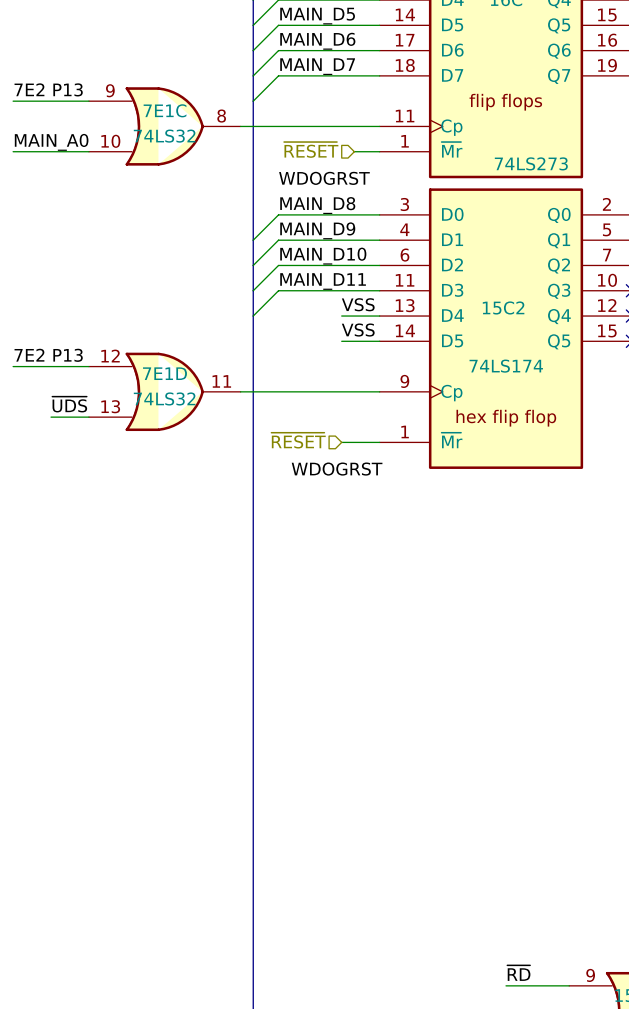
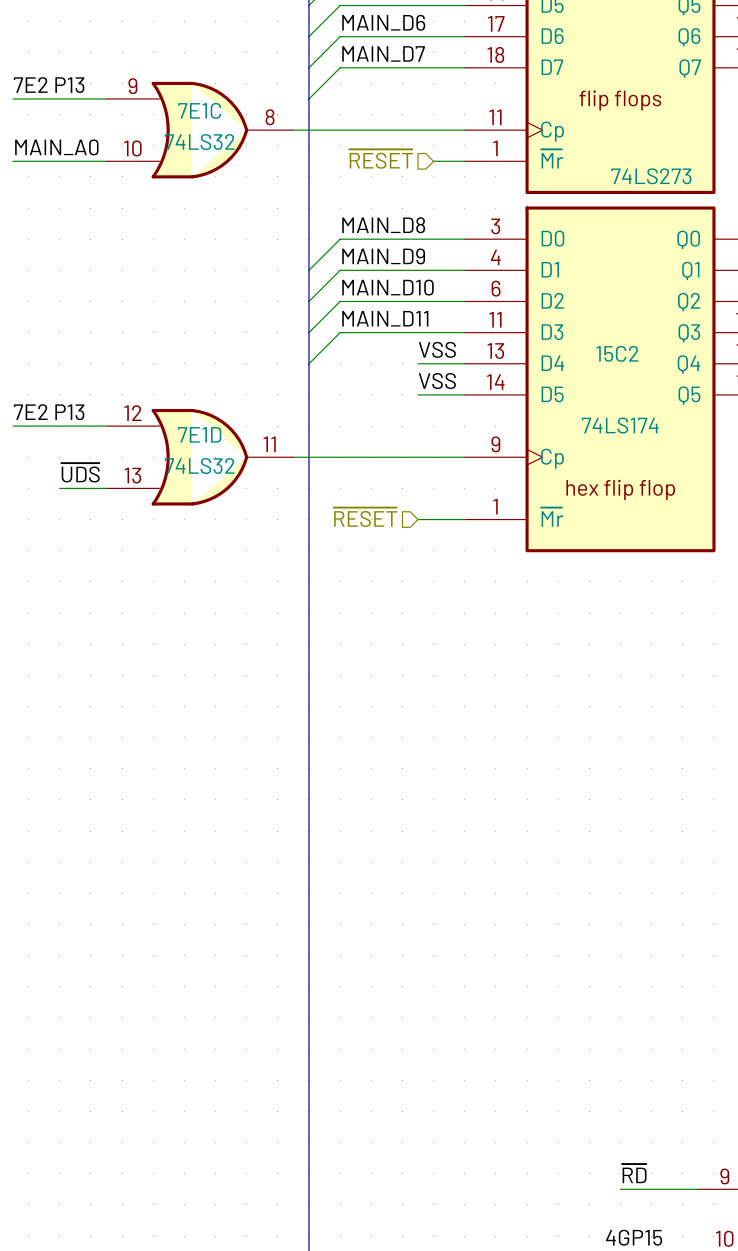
label: WDOGRST (324, 178) -> none
label: WDOGRST (337, 469) -> none

